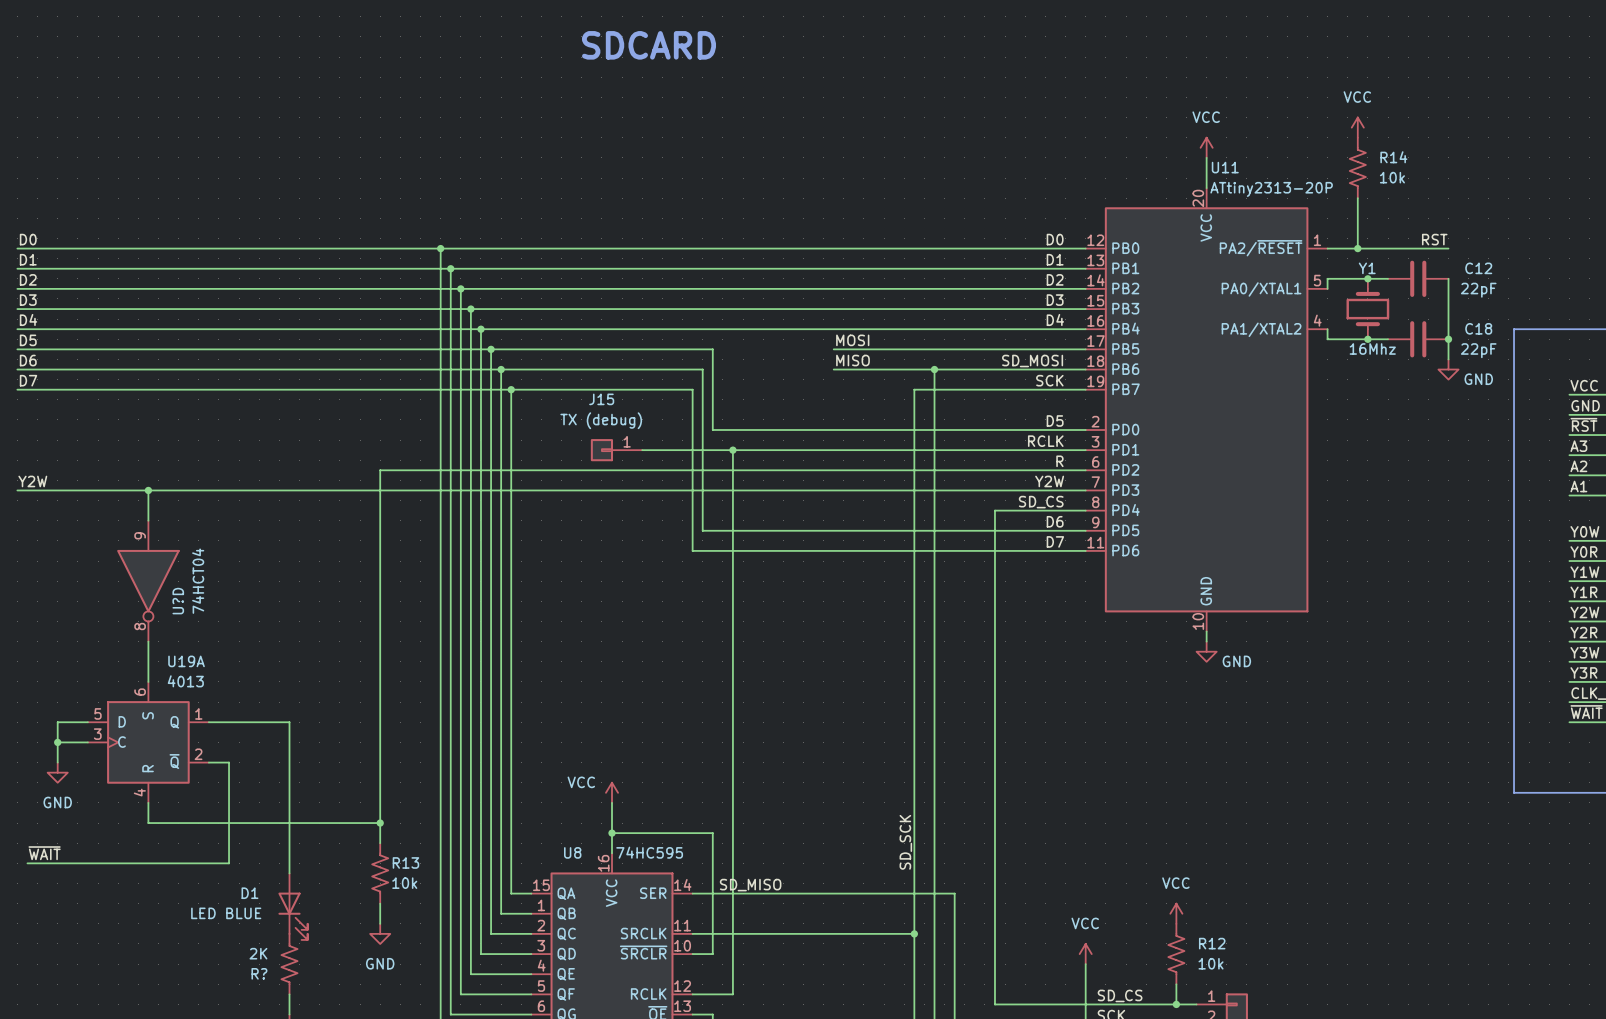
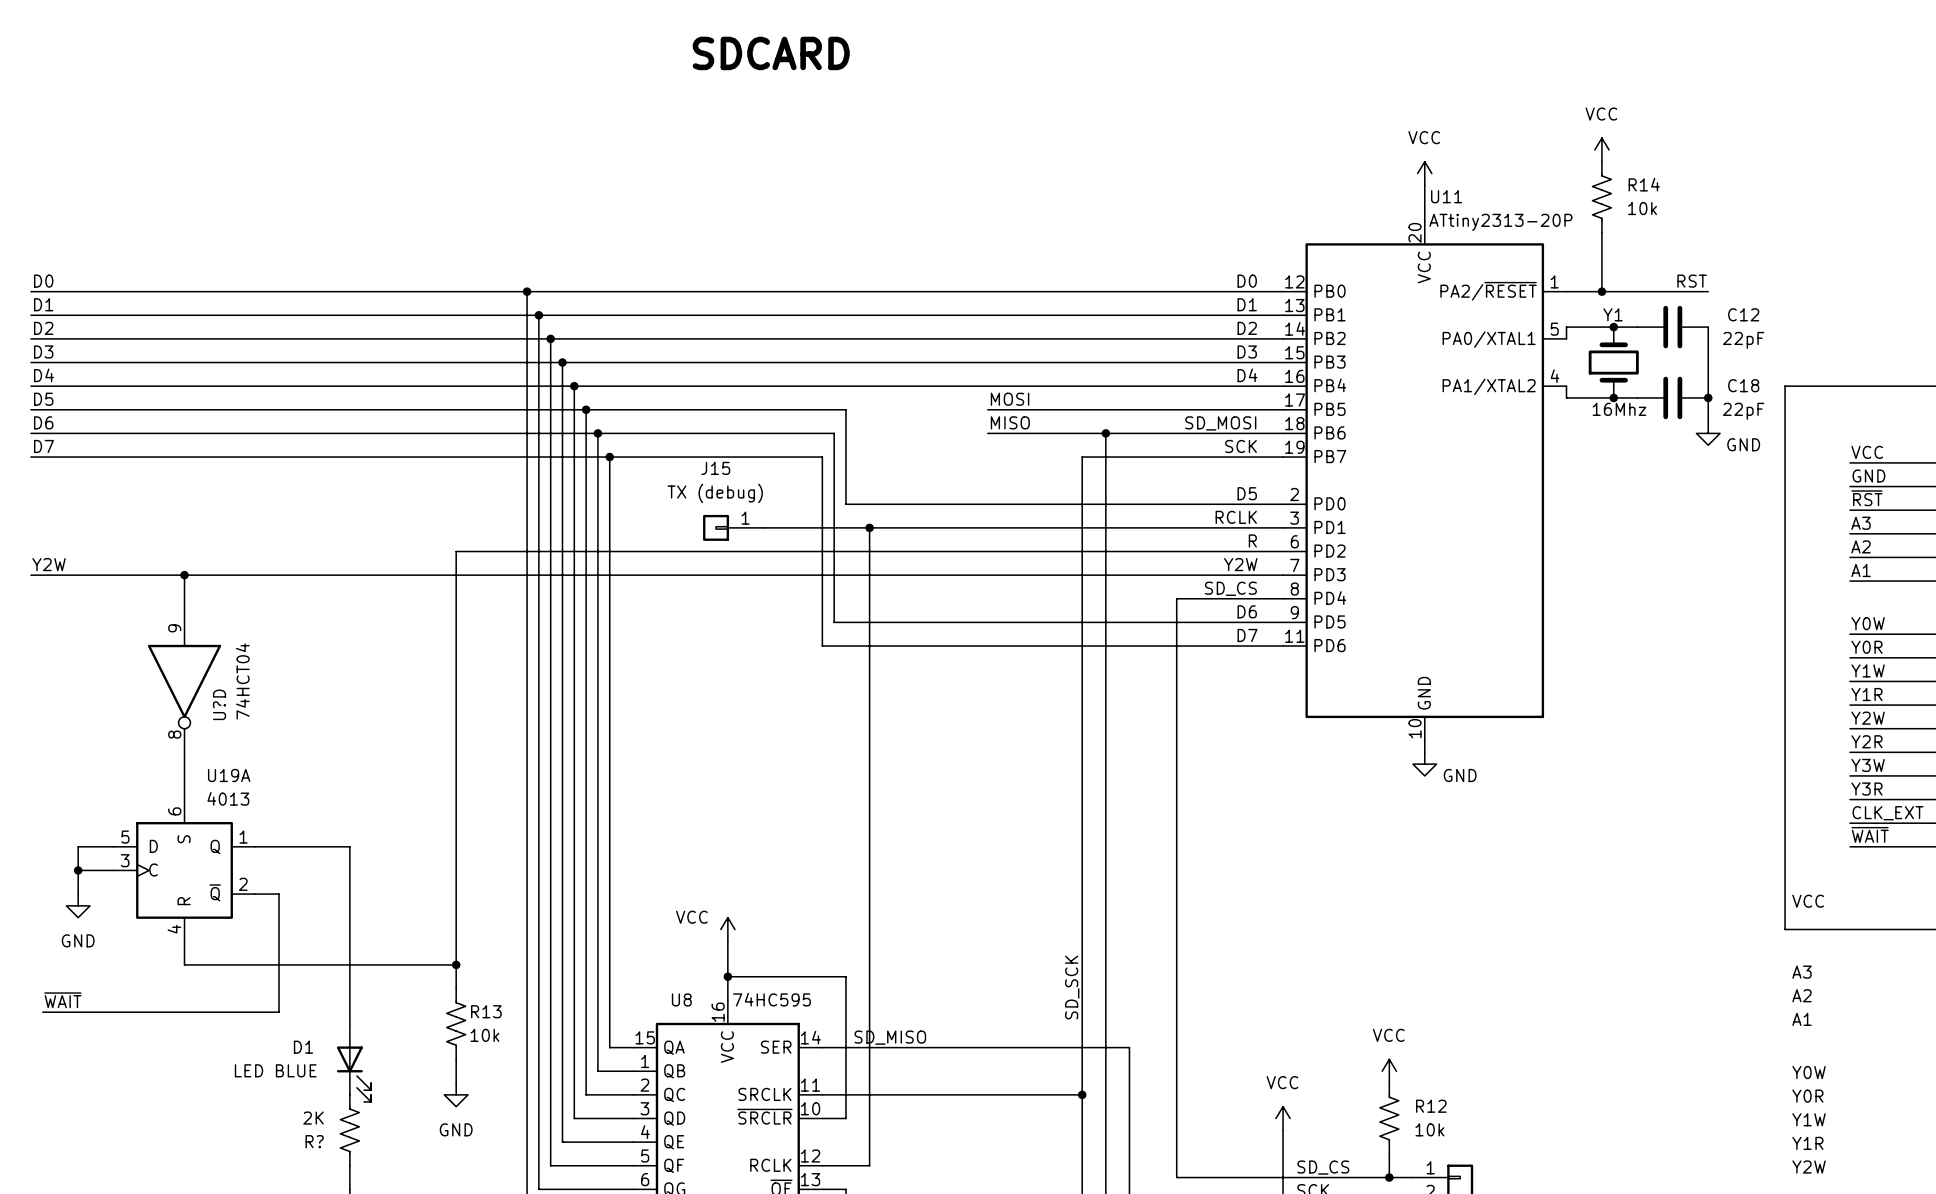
label: none -> VCC (1808, 901)
label: none -> A3 (1801, 972)
label: none -> A2 (1801, 995)
label: none -> A1 (1801, 1019)
label: none -> Y0W (1809, 1072)
label: none -> Y0R (1807, 1096)
label: none -> Y1W (1809, 1119)
label: none -> Y1R (1807, 1143)
label: none -> Y2W (1809, 1167)

